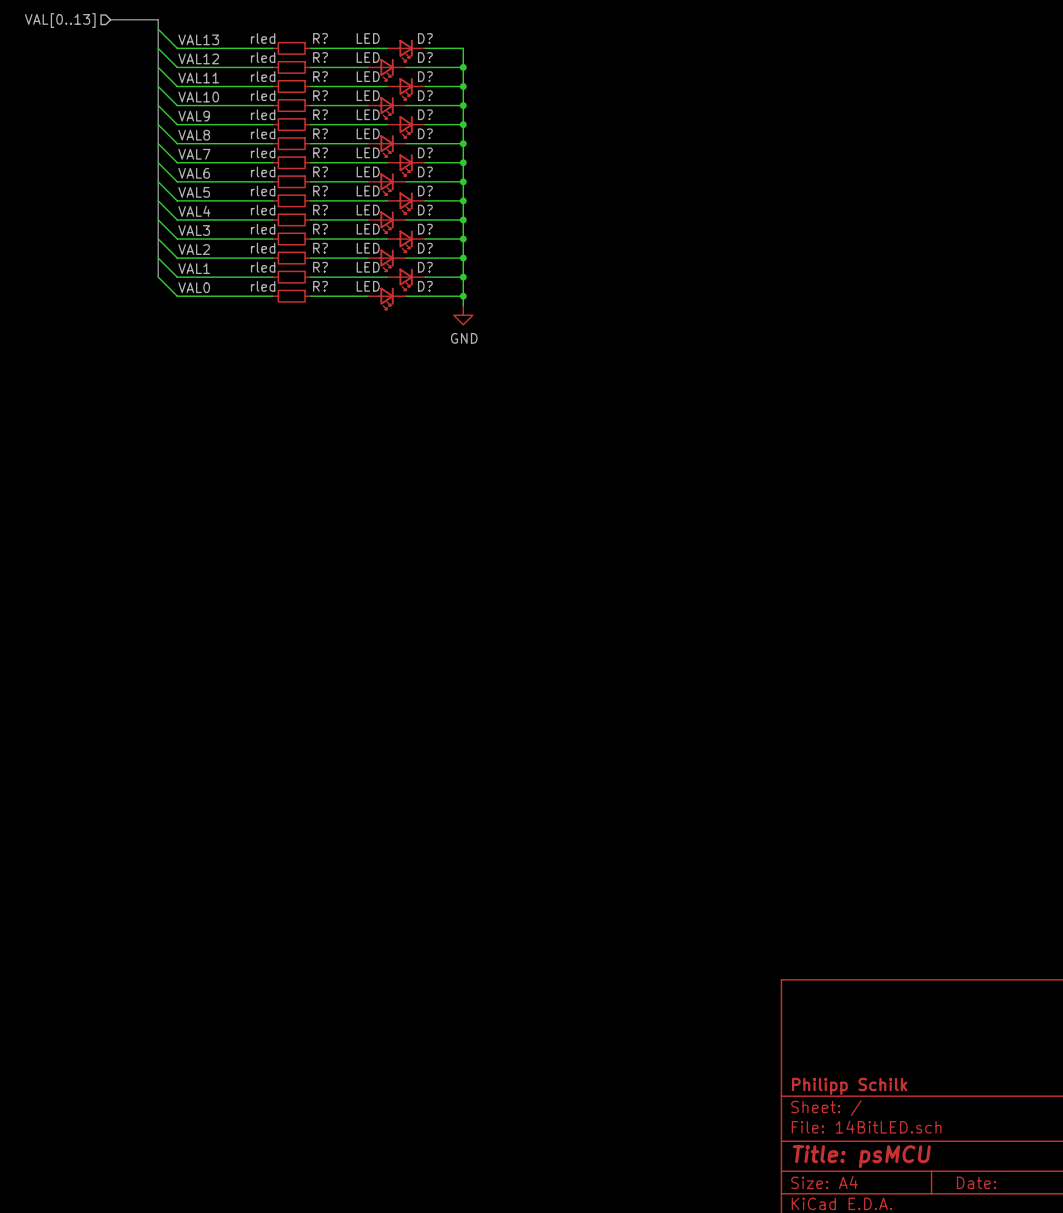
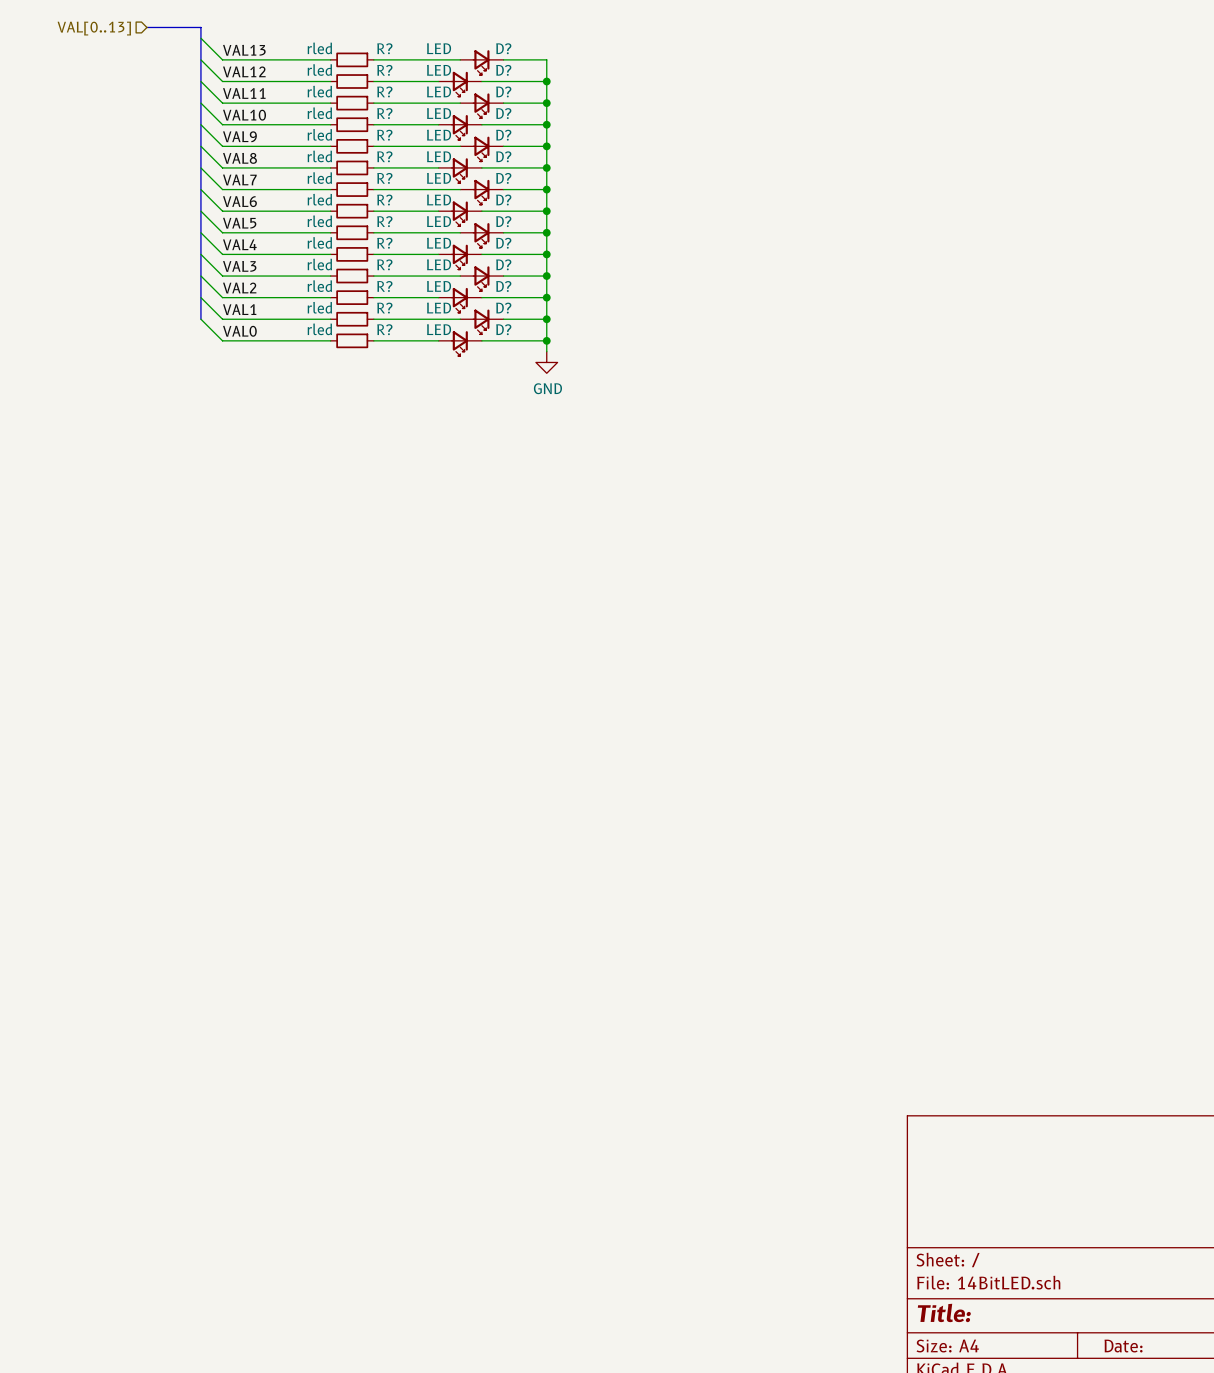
title block: Philipp Schilk (849, 1086) -> none
title block: Title: psMCU (861, 1156) -> Title: (944, 1312)

